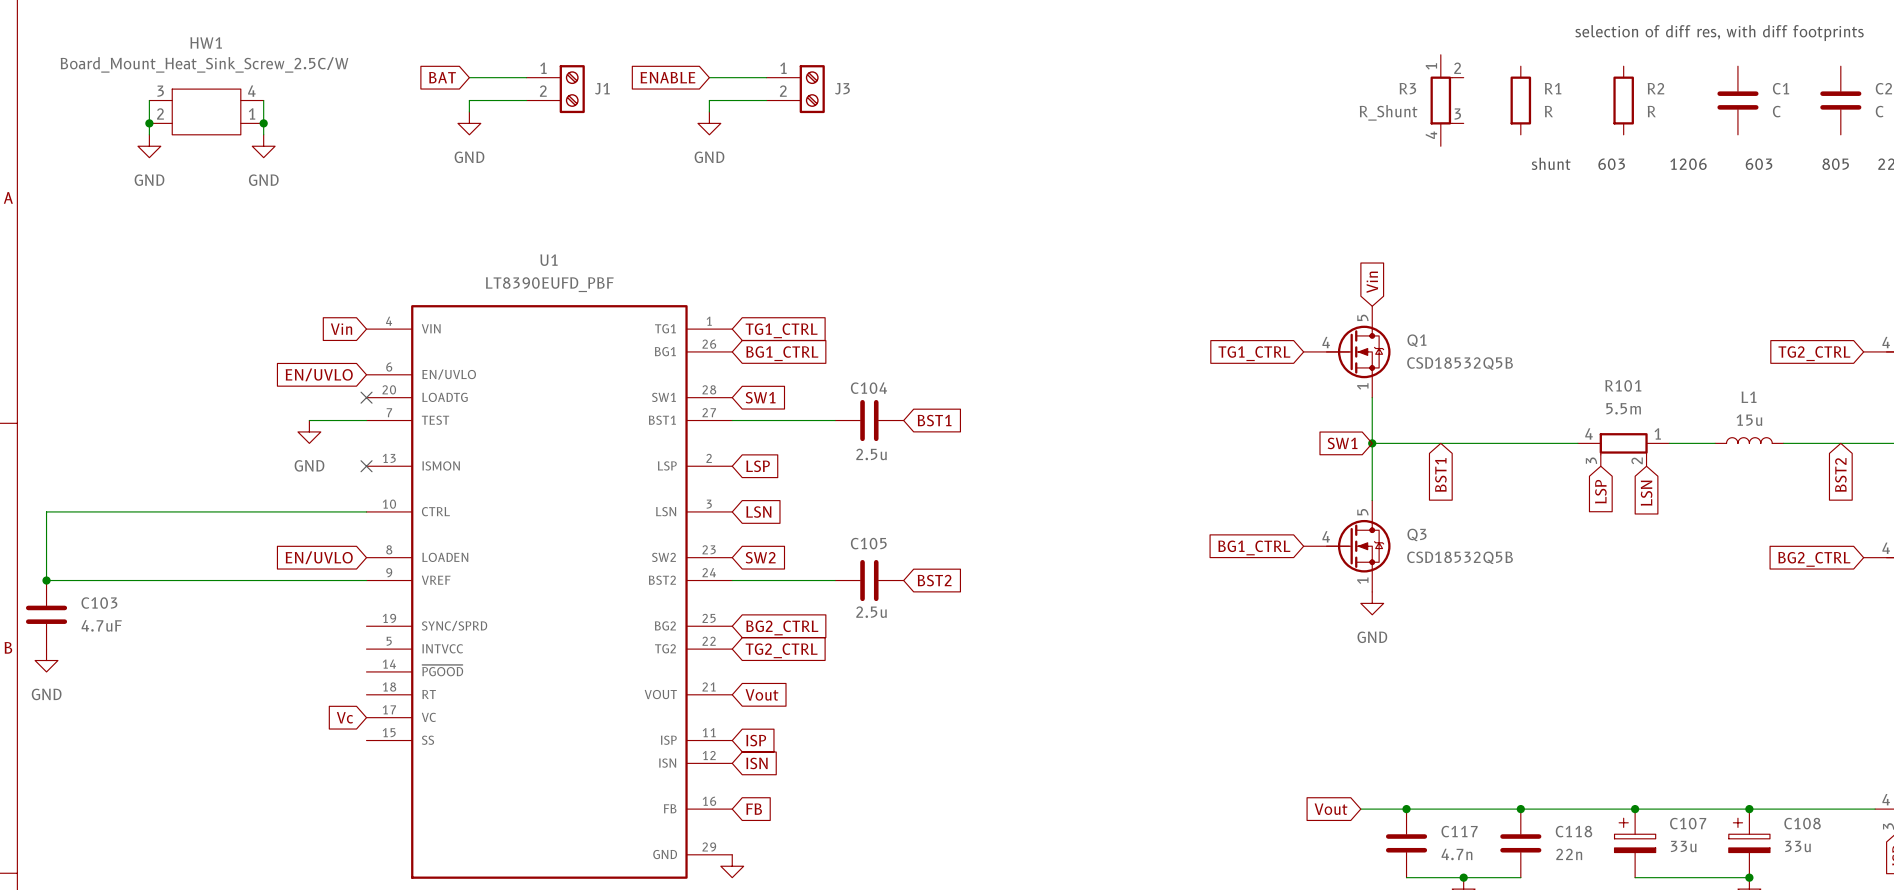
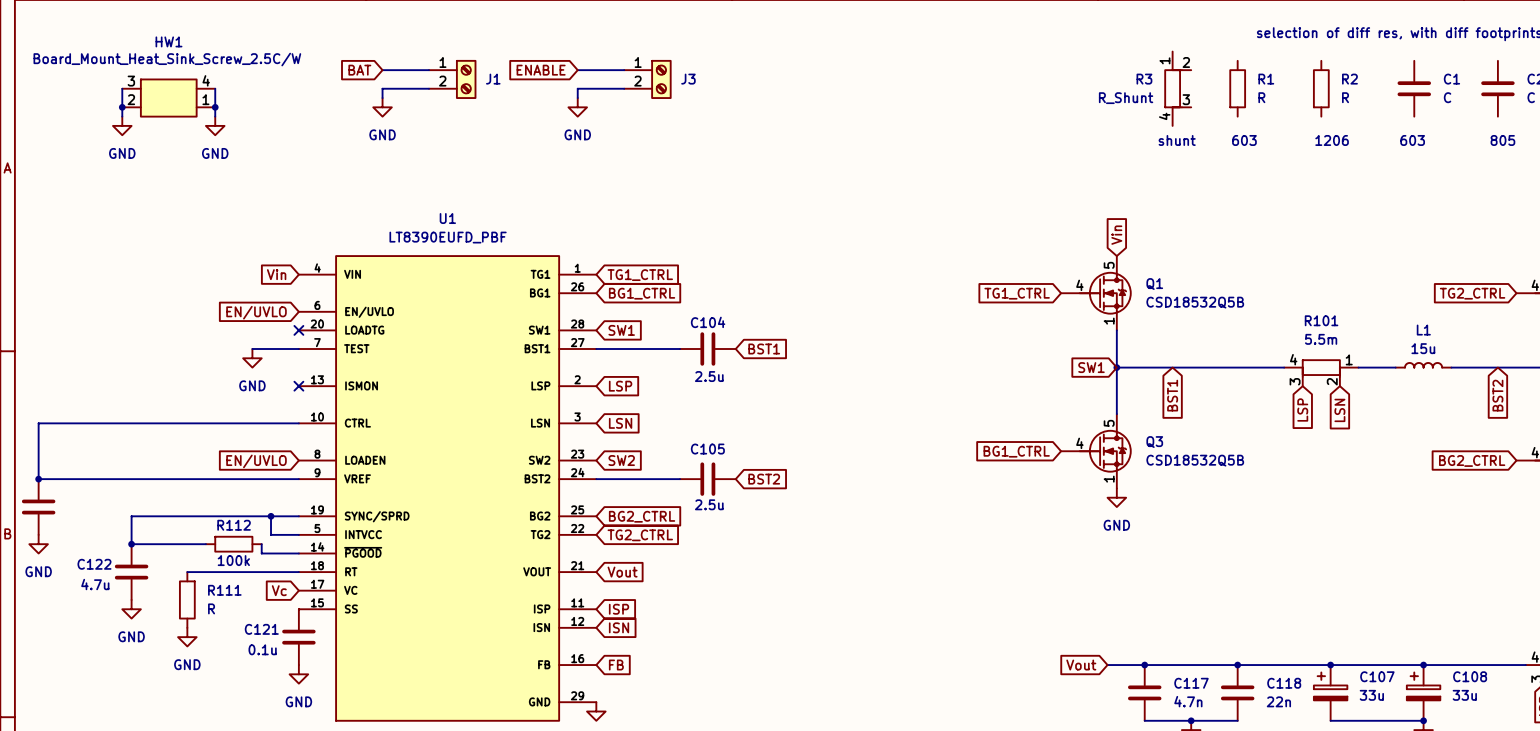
C103 name: C103 (99, 603) -> none
C103 value: 4.7uF (101, 625) -> none
wire: none -> (271, 516) (271, 534) (298, 534)
junction: none -> (271, 516)
wire: none -> (298, 516) (131, 516) (131, 544) (205, 544)
junction: none -> (131, 544)
R112: none -> 100k (233, 544)
wire: none -> (261, 544) (261, 553) (298, 553)
C122: none -> 4.7u (131, 572)
wire: none -> (187, 572) (298, 572)
R111: none -> R (187, 599)
power symbol: none -> GND (131, 609)
power symbol: none -> GND (187, 637)
C121: none -> 0.1u (298, 637)
power symbol: none -> GND (298, 674)

